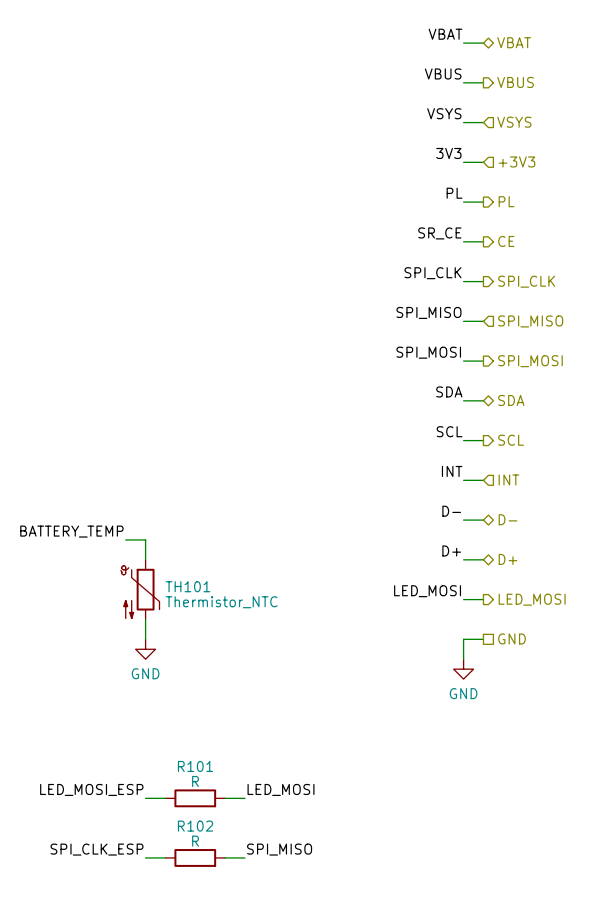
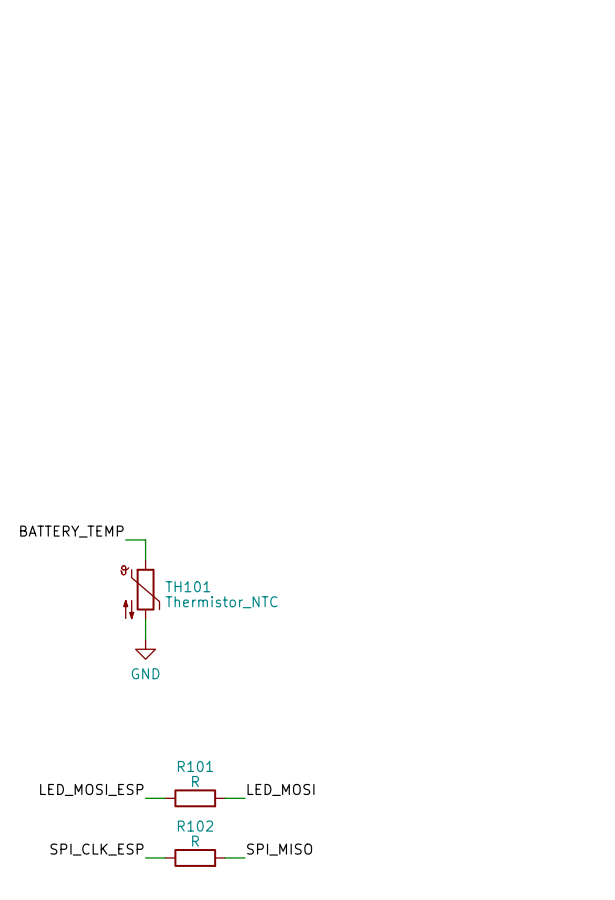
label: VBAT (445, 34) -> none
hierarchical label: VBAT (514, 42) -> none
wire: (463, 43) (483, 43) -> none
label: VBUS (443, 73) -> none
wire: (463, 82) (483, 82) -> none
hierarchical label: VBUS (515, 82) -> none
label: VSYS (444, 113) -> none
wire: (463, 122) (483, 122) -> none
hierarchical label: VSYS (514, 122) -> none
label: 3V3 (448, 153) -> none
hierarchical label: +3V3 (516, 161) -> none
wire: (463, 162) (483, 162) -> none
label: PL (454, 193) -> none
hierarchical label: PL (506, 201) -> none
wire: (463, 202) (483, 202) -> none
label: SR_CE (439, 233) -> none
wire: (463, 241) (483, 241) -> none
hierarchical label: CE (506, 241) -> none
label: SPI_CLK (432, 273) -> none
wire: (463, 281) (483, 281) -> none
hierarchical label: SPI_CLK (526, 281) -> none
label: SPI_MISO (428, 312) -> none
wire: (463, 321) (483, 321) -> none
hierarchical label: SPI_MISO (530, 321) -> none
label: SPI_MOSI (428, 352) -> none
wire: (463, 361) (483, 361) -> none
hierarchical label: SPI_MOSI (530, 361) -> none
label: SDA (449, 391) -> none
wire: (463, 400) (483, 400) -> none
hierarchical label: SDA (511, 400) -> none
label: SCL (449, 431) -> none
wire: (463, 440) (483, 440) -> none
hierarchical label: SCL (511, 440) -> none
label: INT (452, 471) -> none
hierarchical label: INT (508, 479) -> none
wire: (463, 480) (483, 480) -> none
label: D- (451, 511) -> none
hierarchical label: D- (507, 519) -> none
wire: (463, 520) (483, 520) -> none
label: D+ (451, 550) -> none
wire: (463, 559) (483, 559) -> none
hierarchical label: D+ (507, 559) -> none
label: LED_MOSI (427, 591) -> none
wire: (463, 599) (483, 599) -> none
hierarchical label: LED_MOSI (532, 599) -> none
hierarchical label: GND (512, 638) -> none
wire: (483, 639) (463, 639) (463, 659) -> none
power symbol: GND (463, 669) -> none

